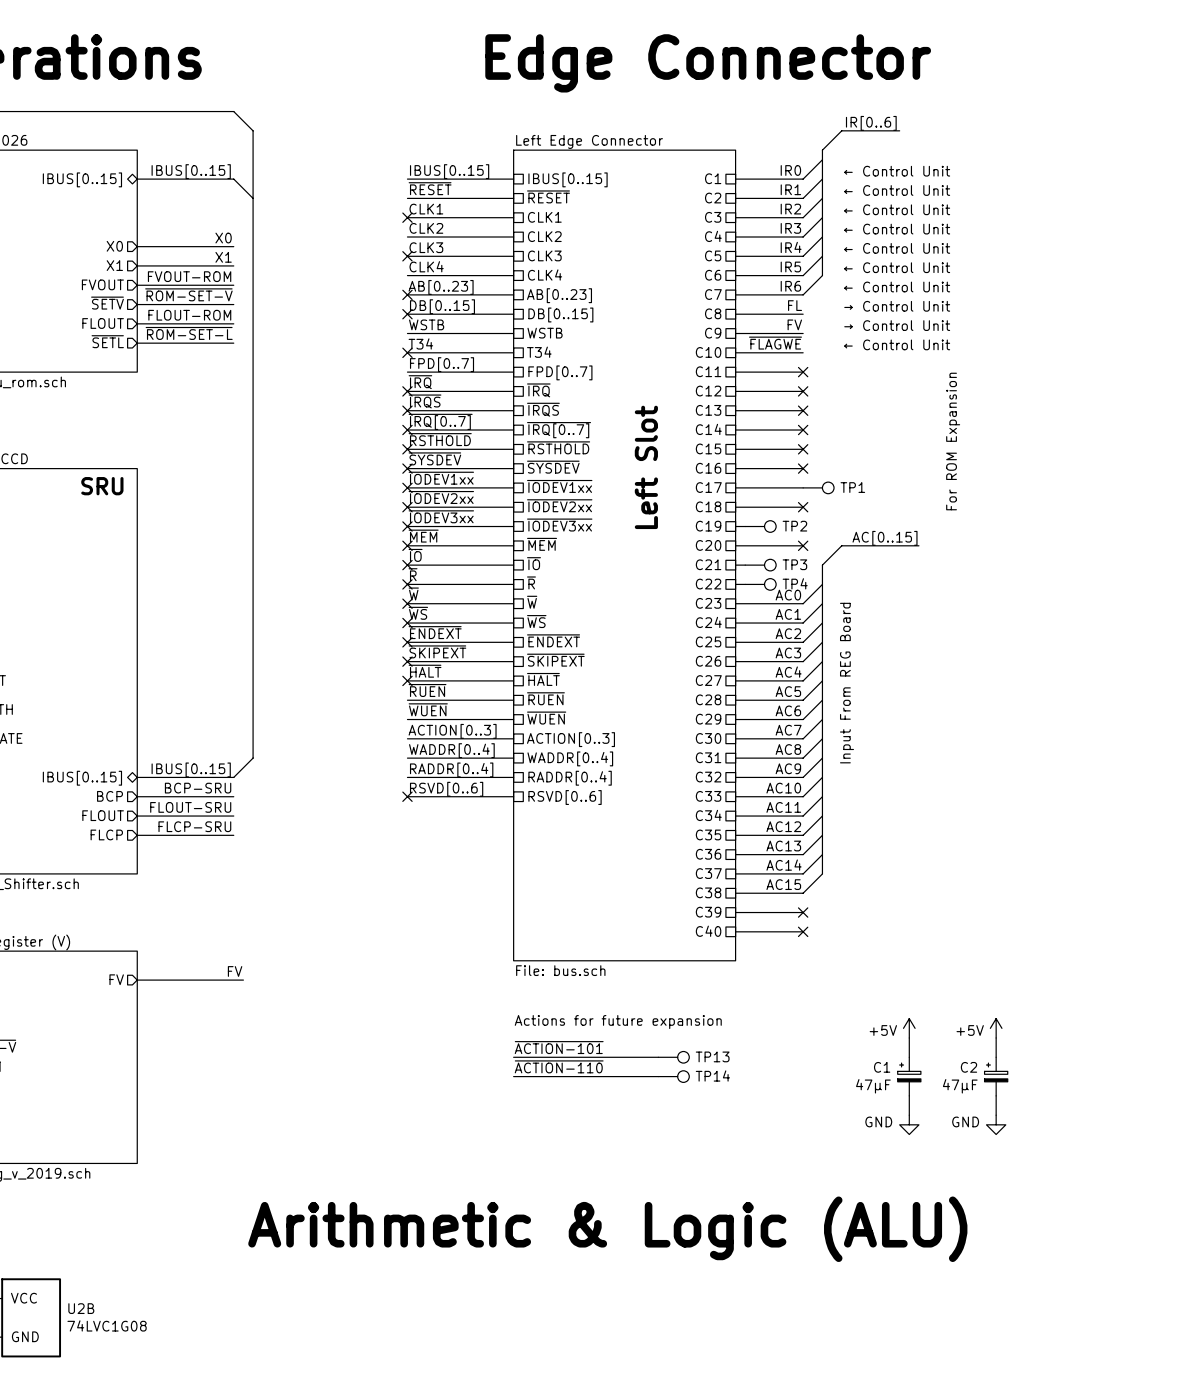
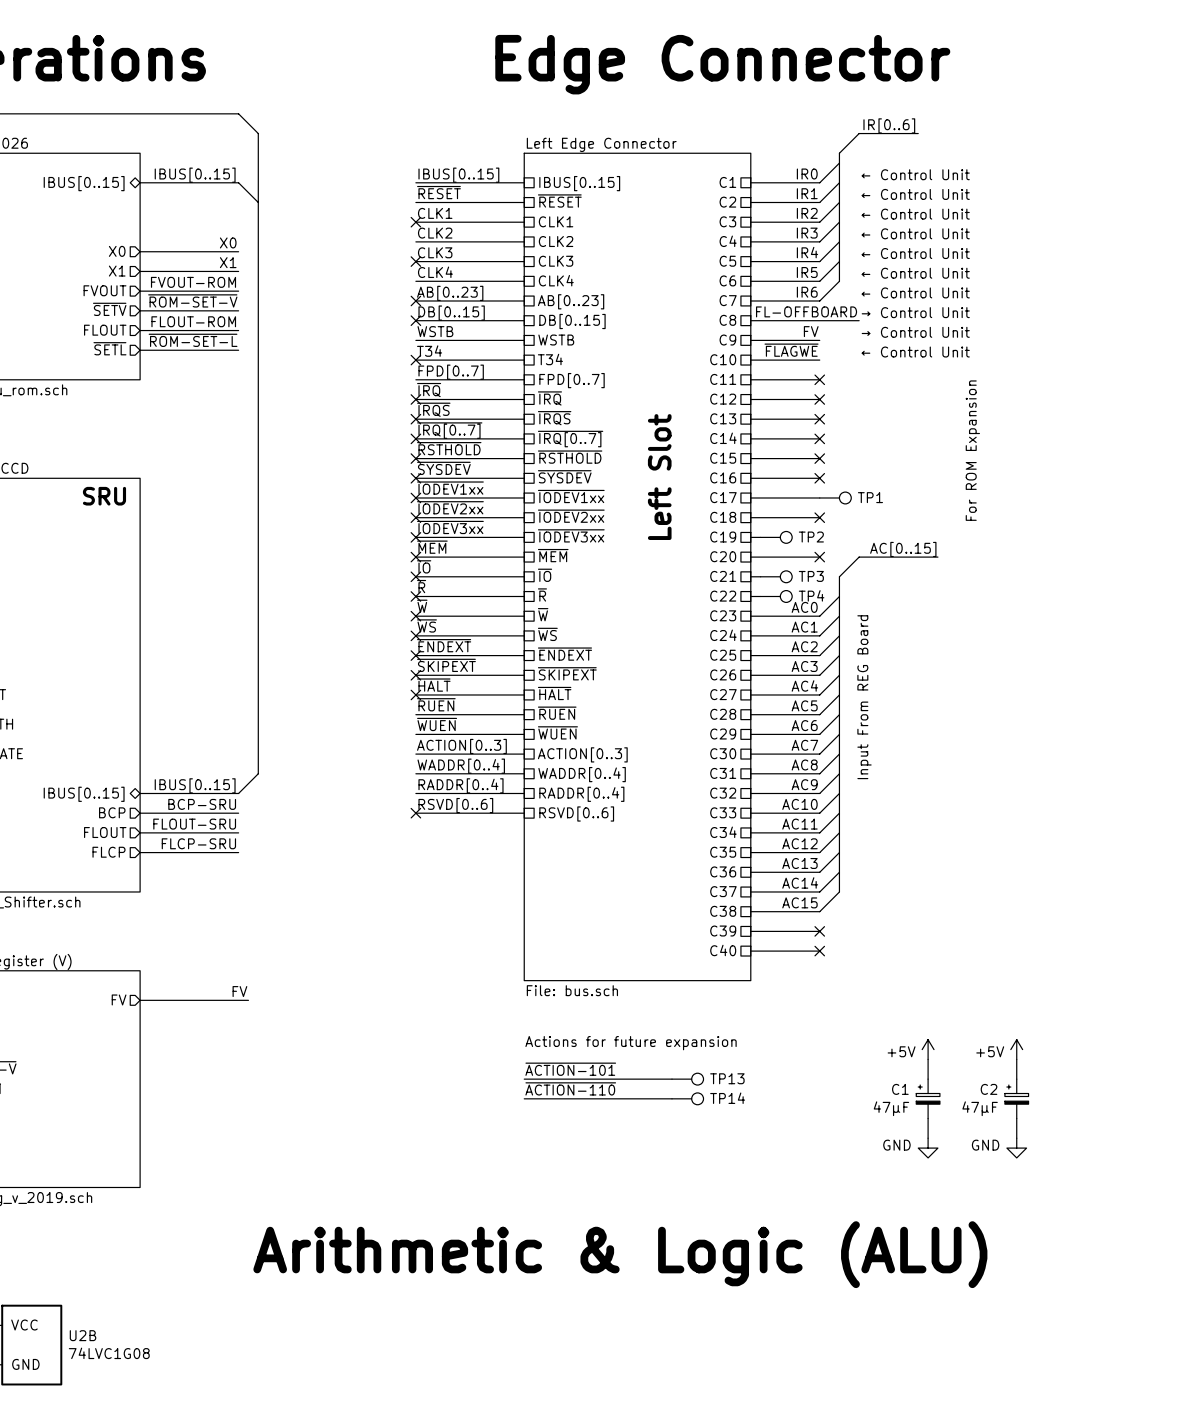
label: none -> FL-OFFBOARD (806, 311)
label: FL (795, 305) -> none
wire: none -> (819, 320) (859, 320)

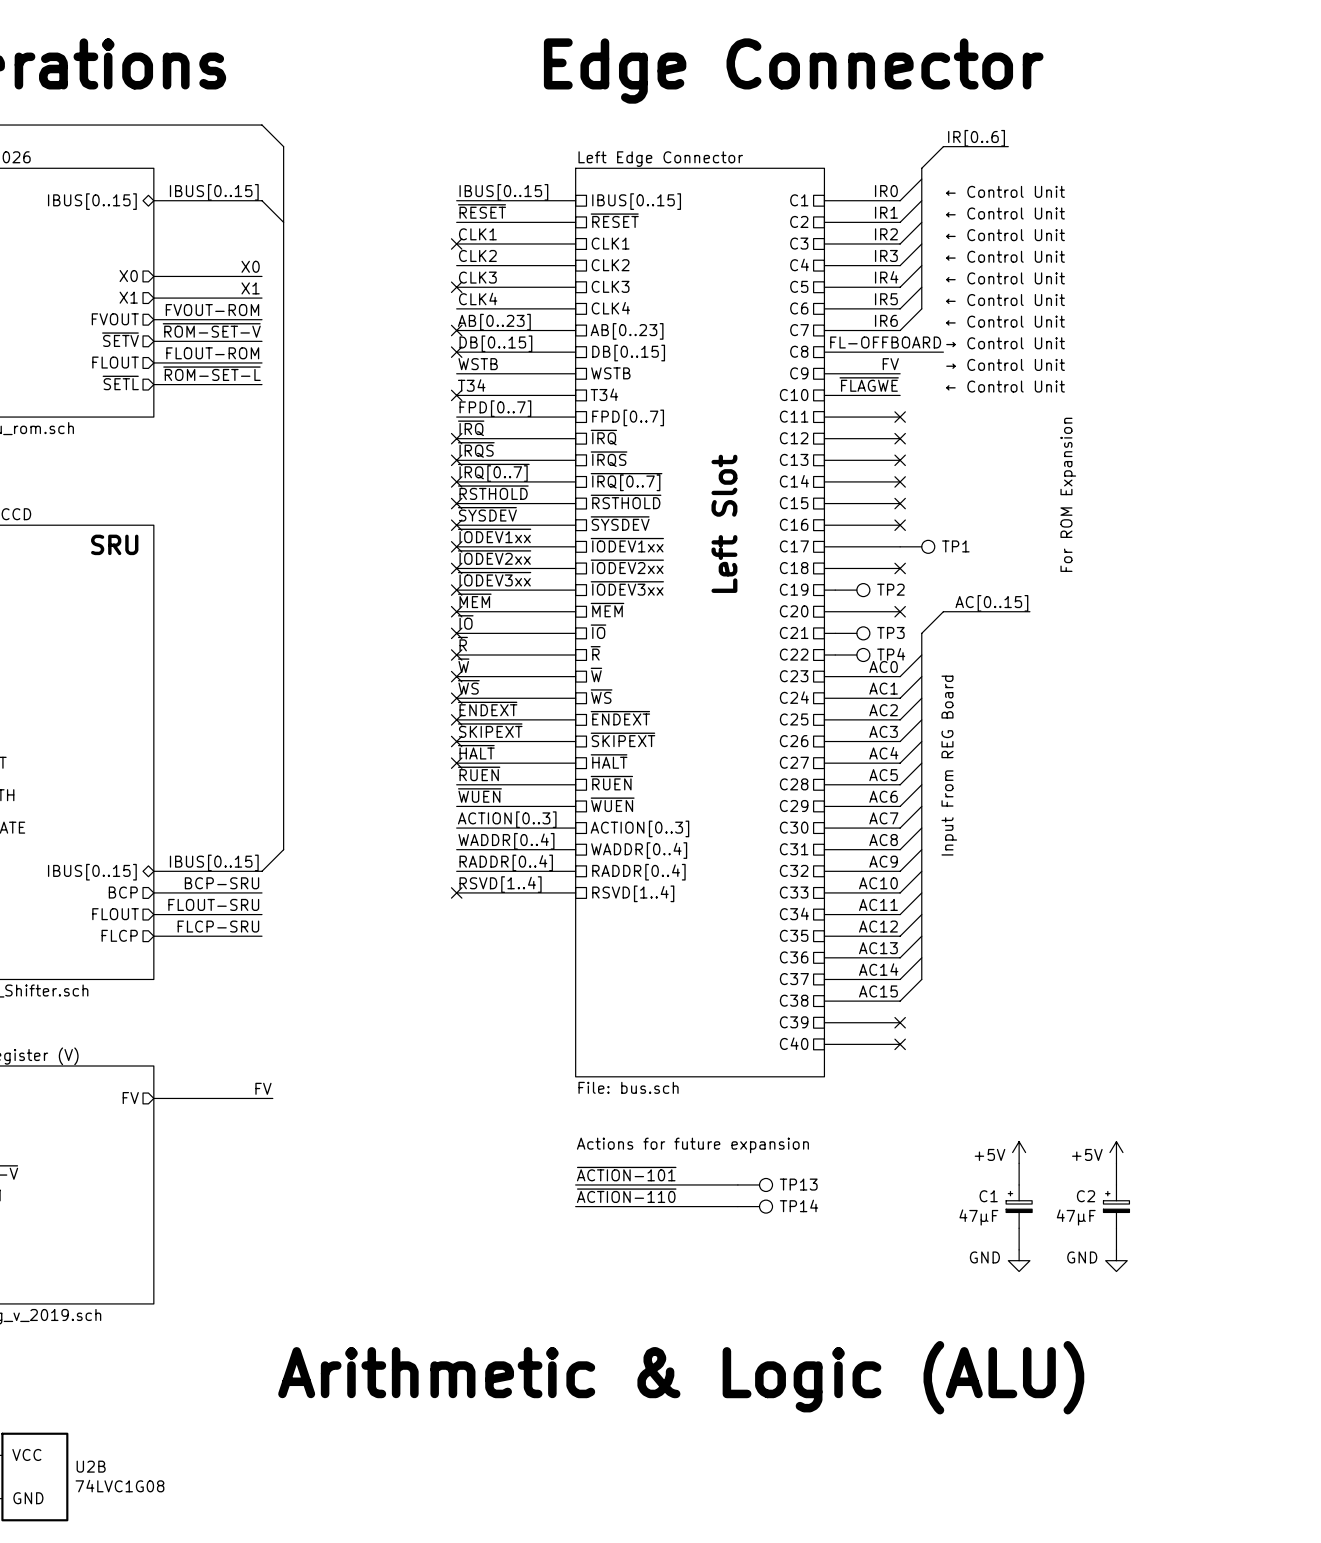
label: RSVD[0..6] (455, 805) -> RSVD[1..4] (500, 884)
sheet pin: RSVD[0..6] (576, 813) -> RSVD[1..4] (633, 893)

